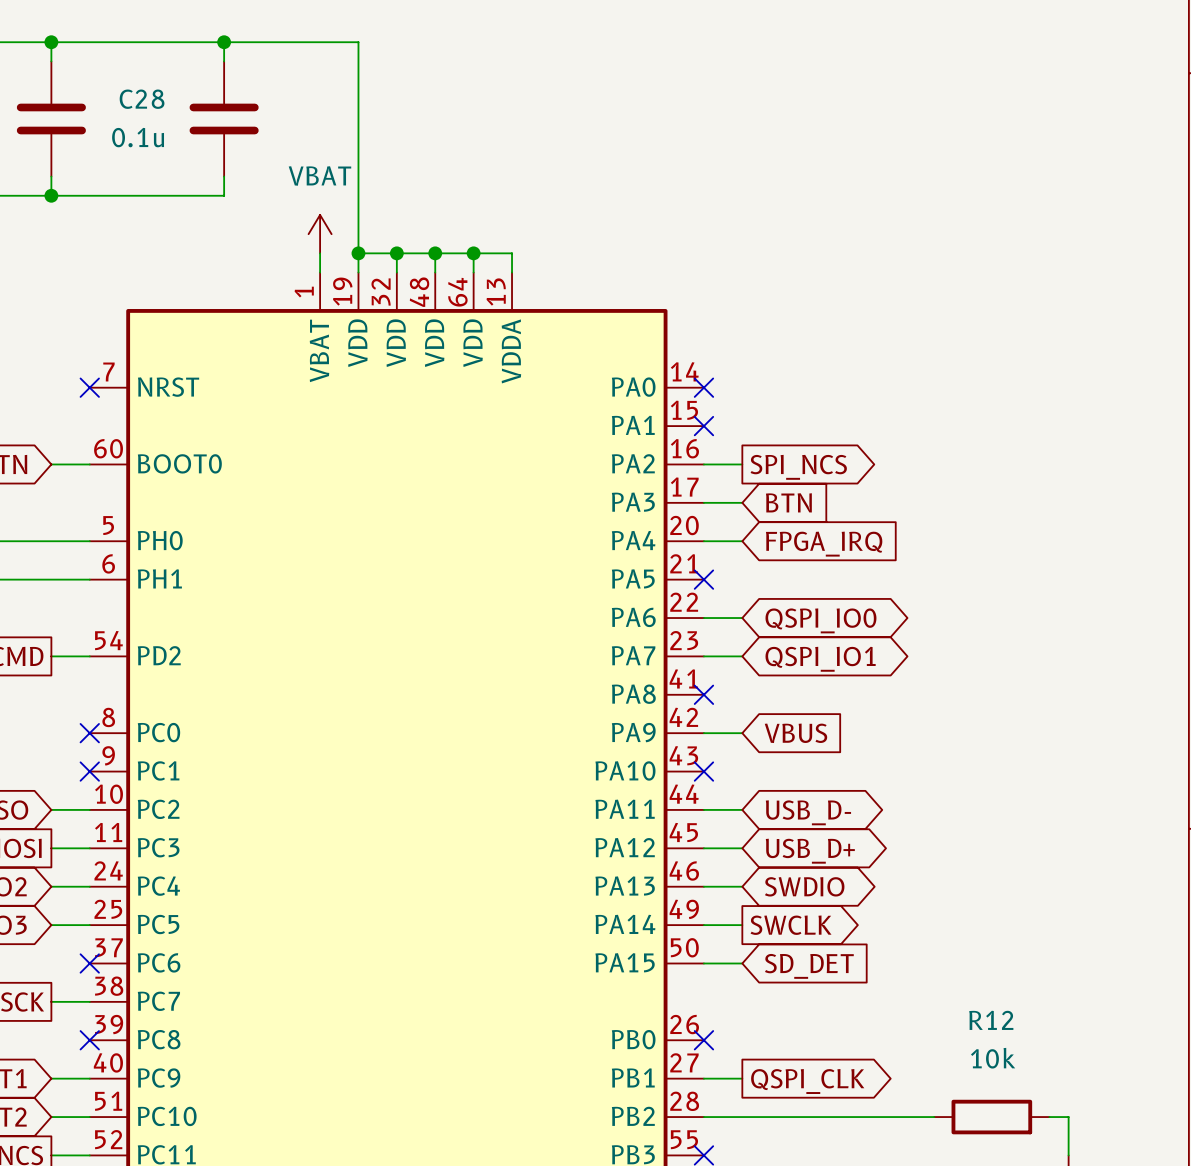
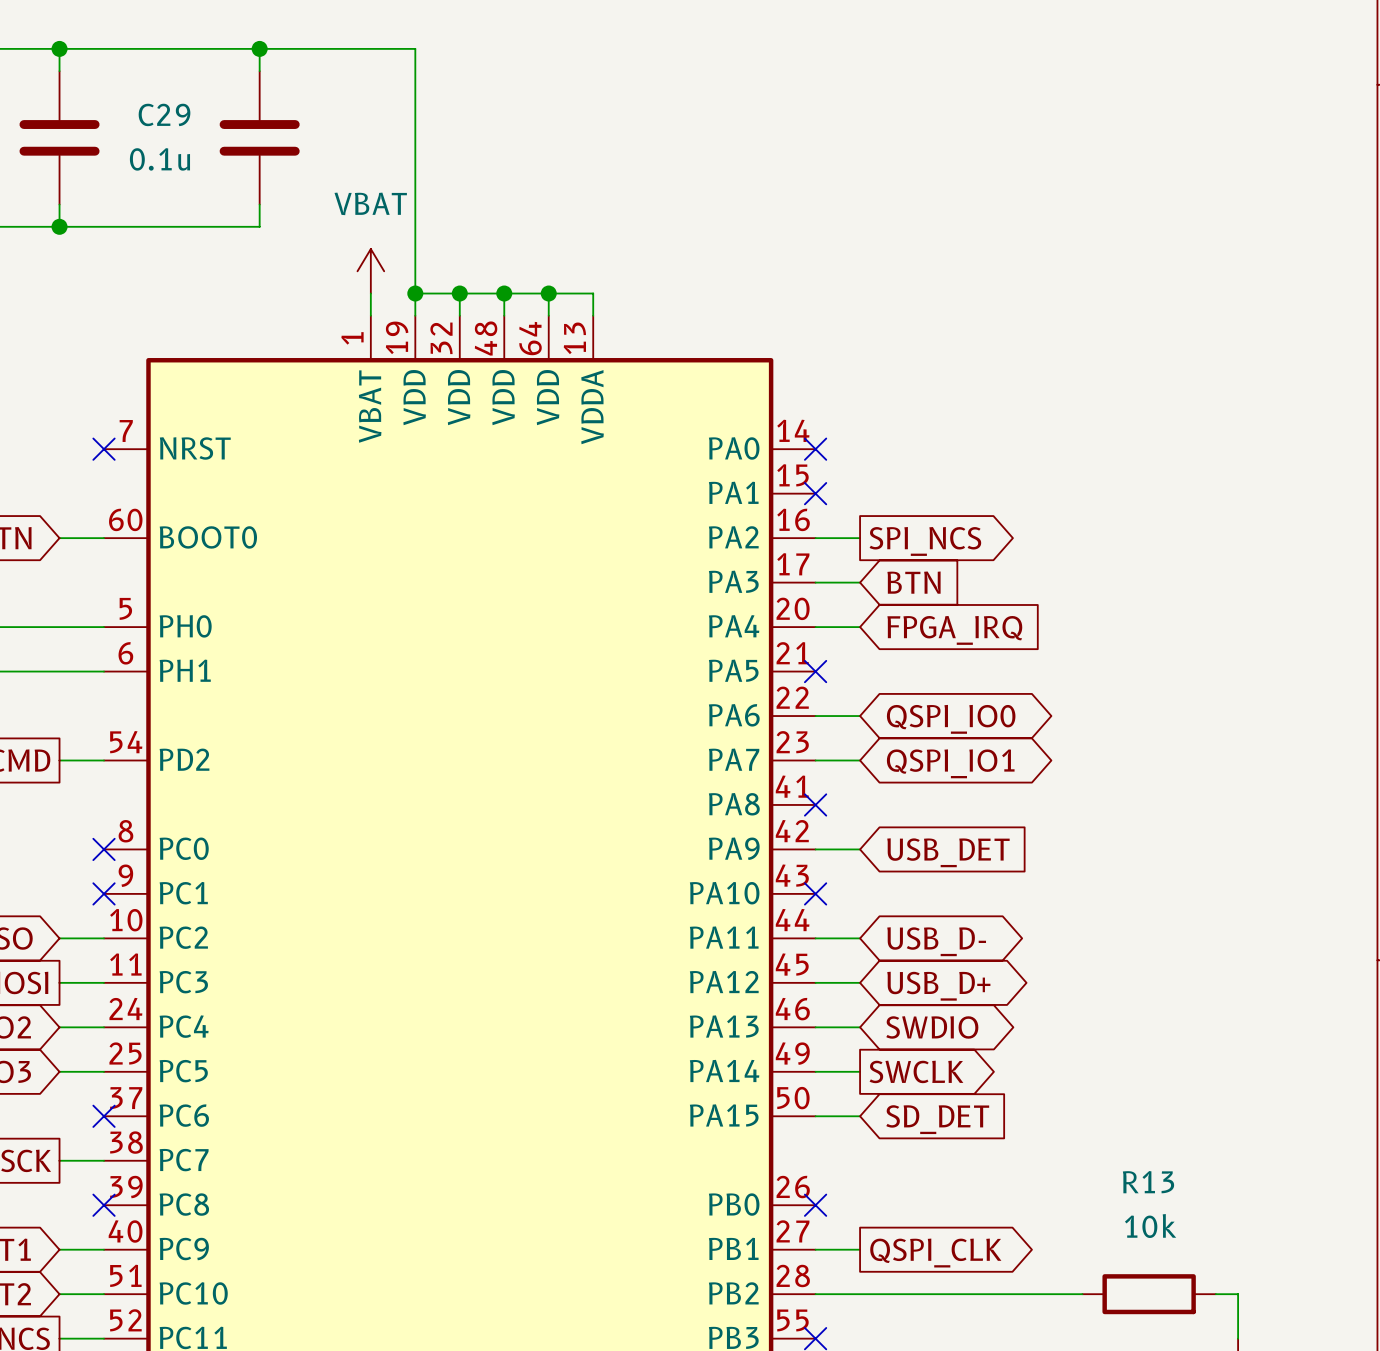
C28 name: C28 (142, 99) -> C29 (164, 114)
global label: VBUS (795, 733) -> USB_DET (948, 852)
R12 name: R12 (991, 1020) -> R13 (1148, 1182)

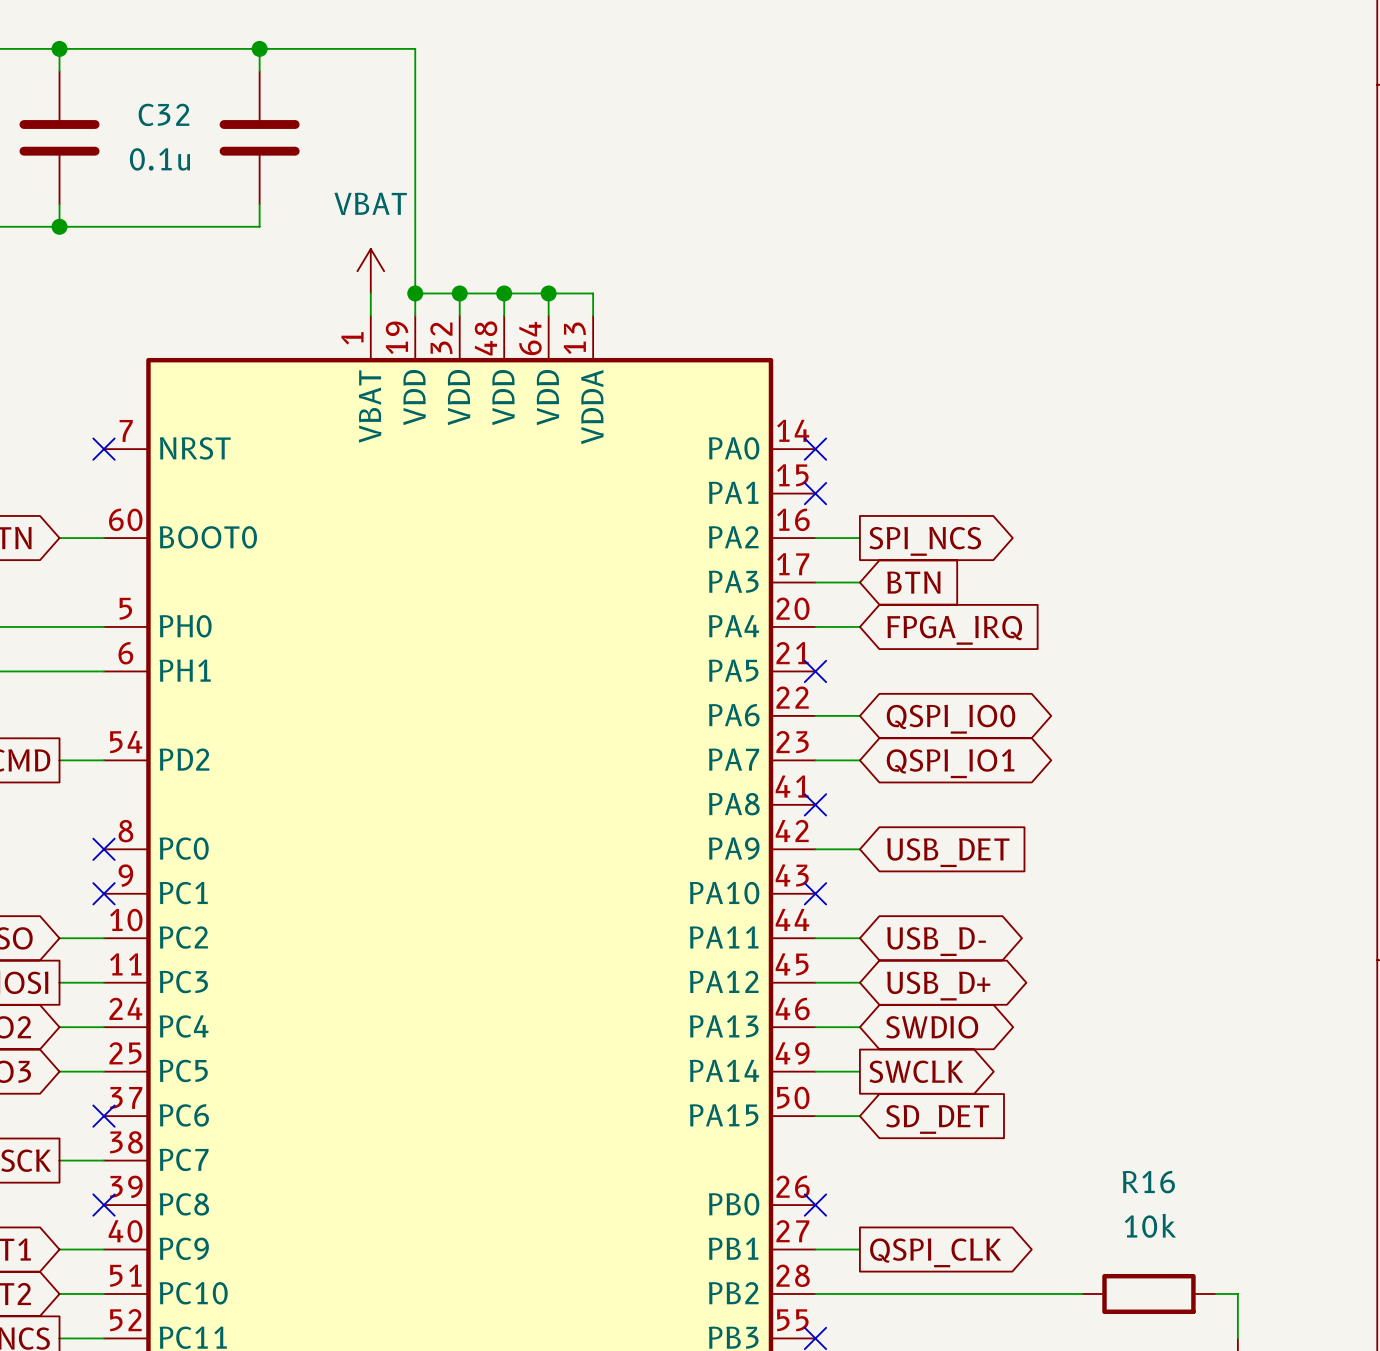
C29 name: C29 (164, 114) -> C32 (164, 114)
R13 name: R13 (1148, 1182) -> R16 (1148, 1182)

